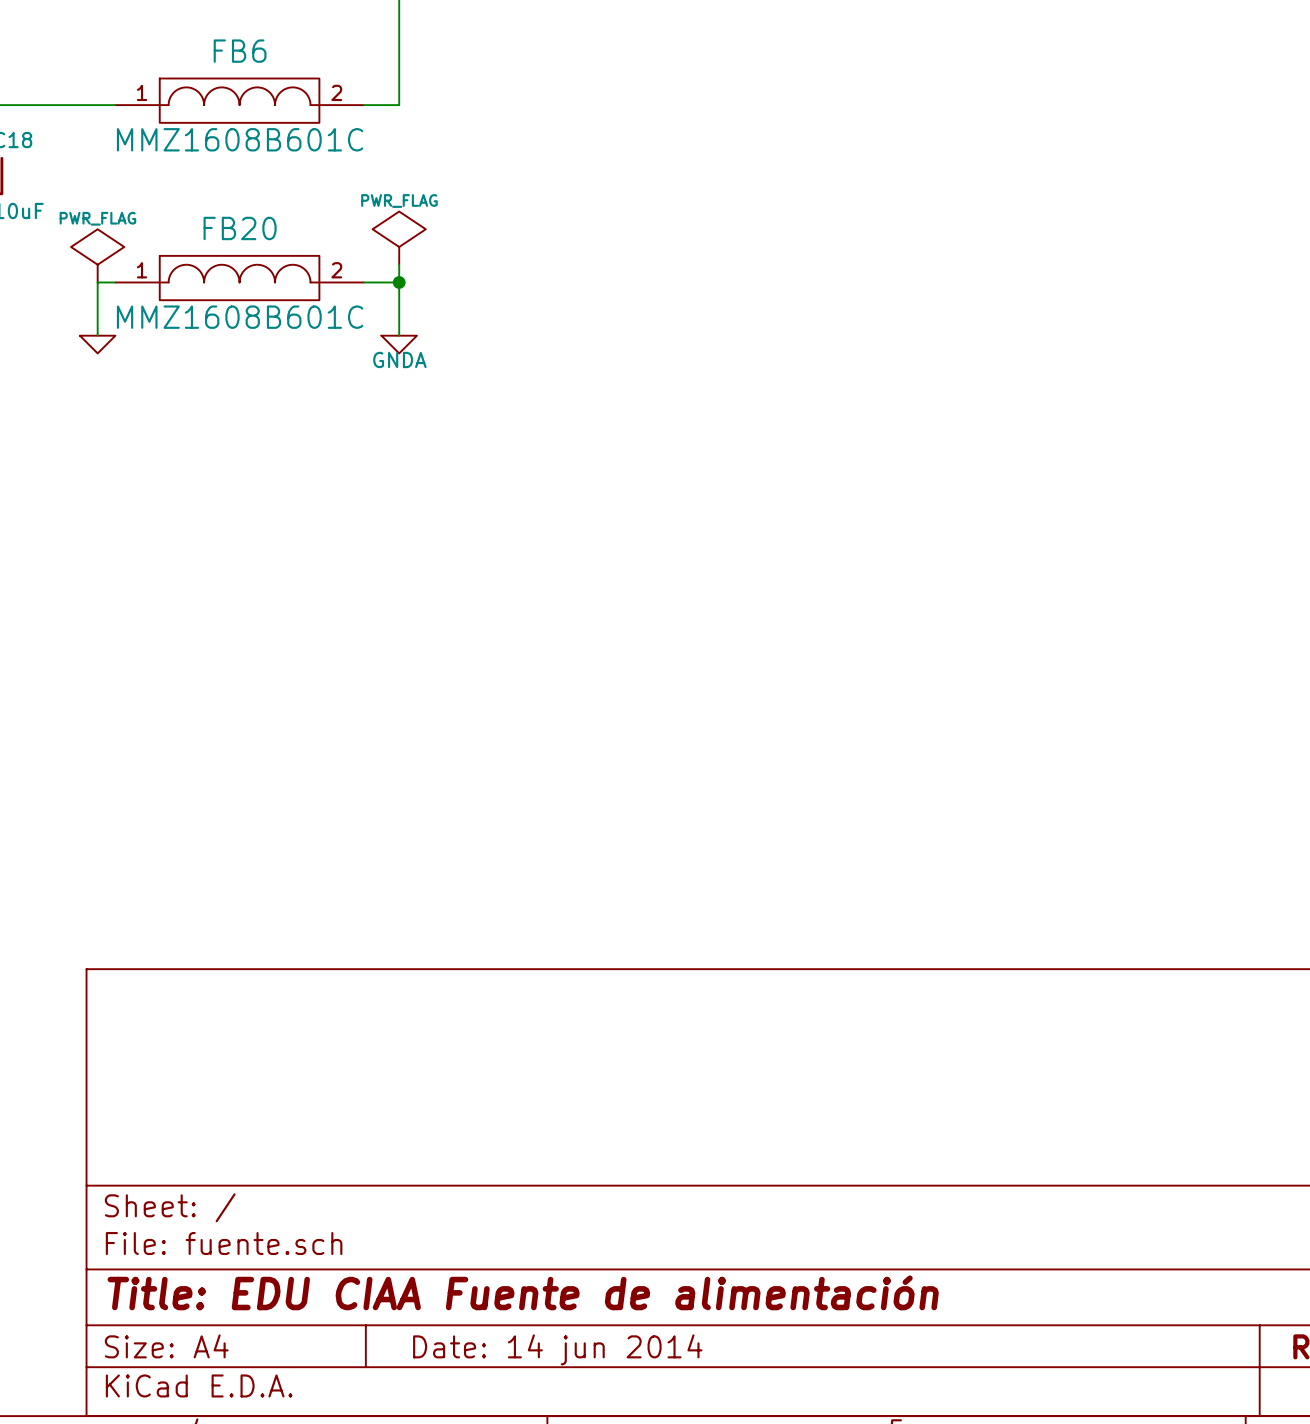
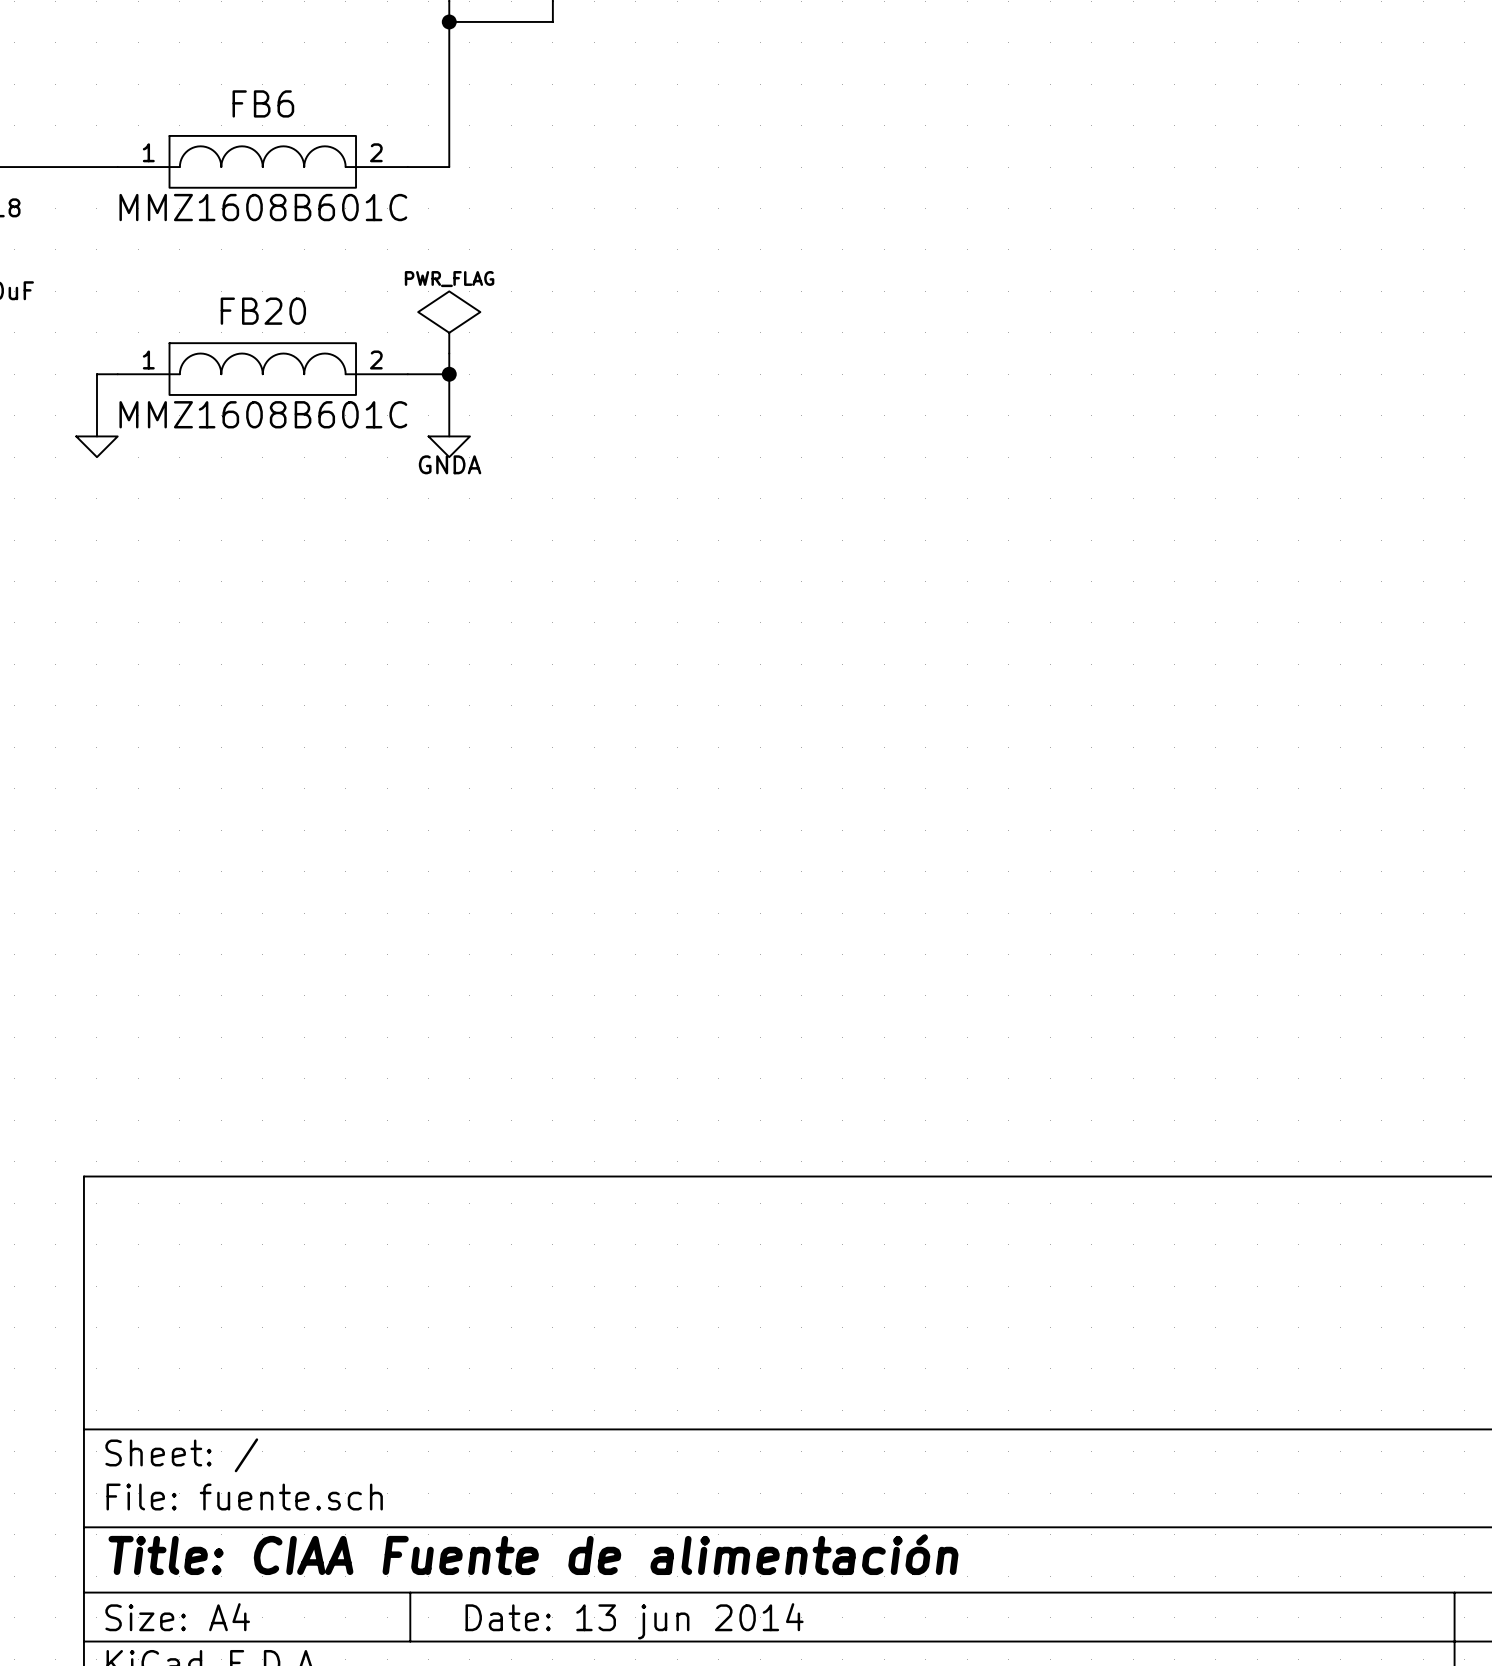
power symbol: PWR_FLAG (97, 255) -> none
title block: Title: EDU CIAA Fuente de alimentación (523, 1292) -> Title: CIAA Fuente de alimentación (533, 1554)
title block: Date: 14 jun 2014 (557, 1349) -> Date: 13 jun 2014 (634, 1621)

